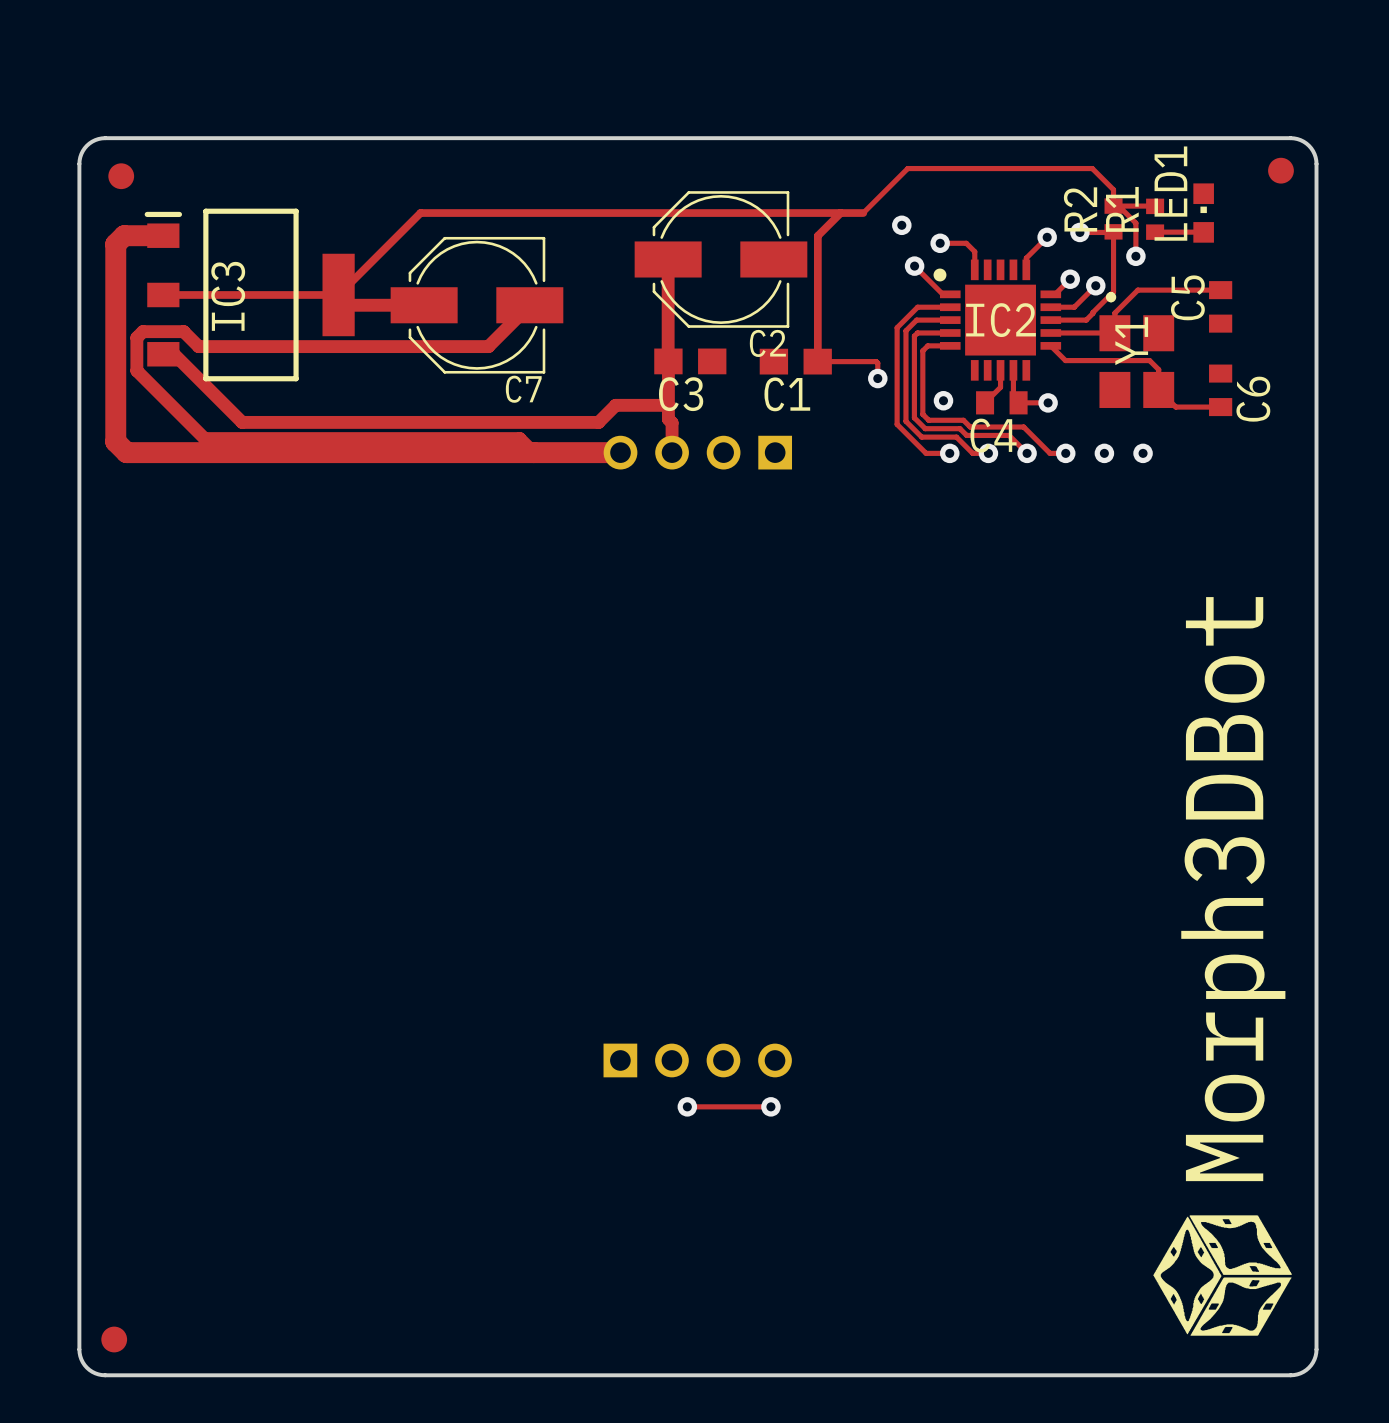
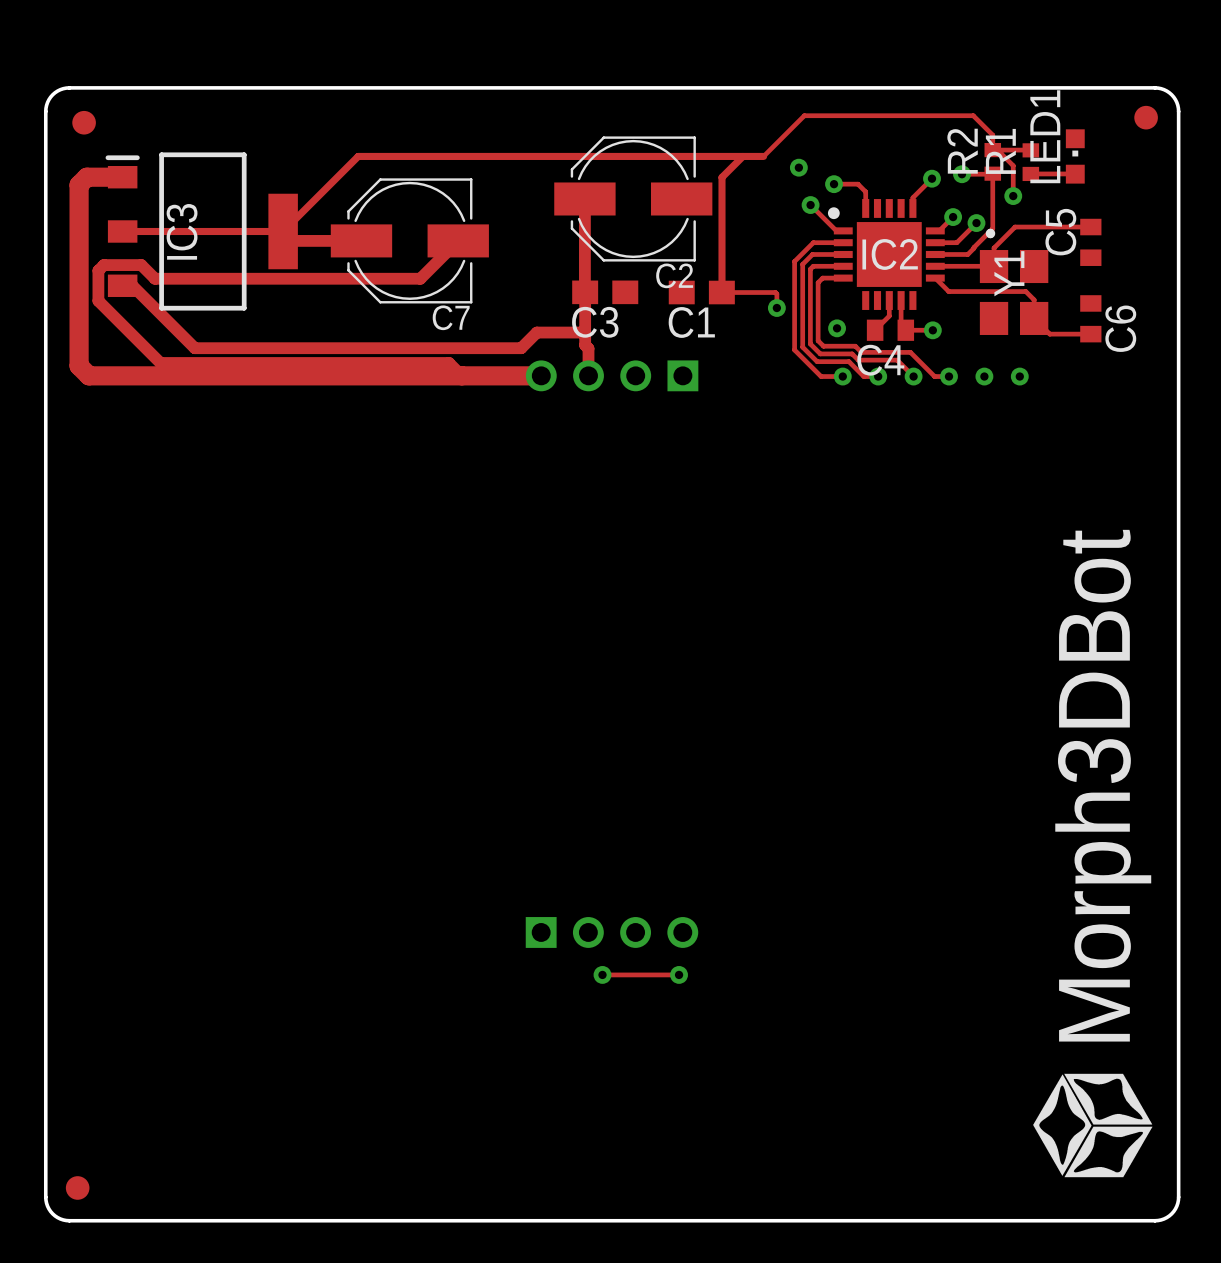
drawing shape: [1153, 597, 1292, 1336] -> [1033, 529, 1153, 1178]

